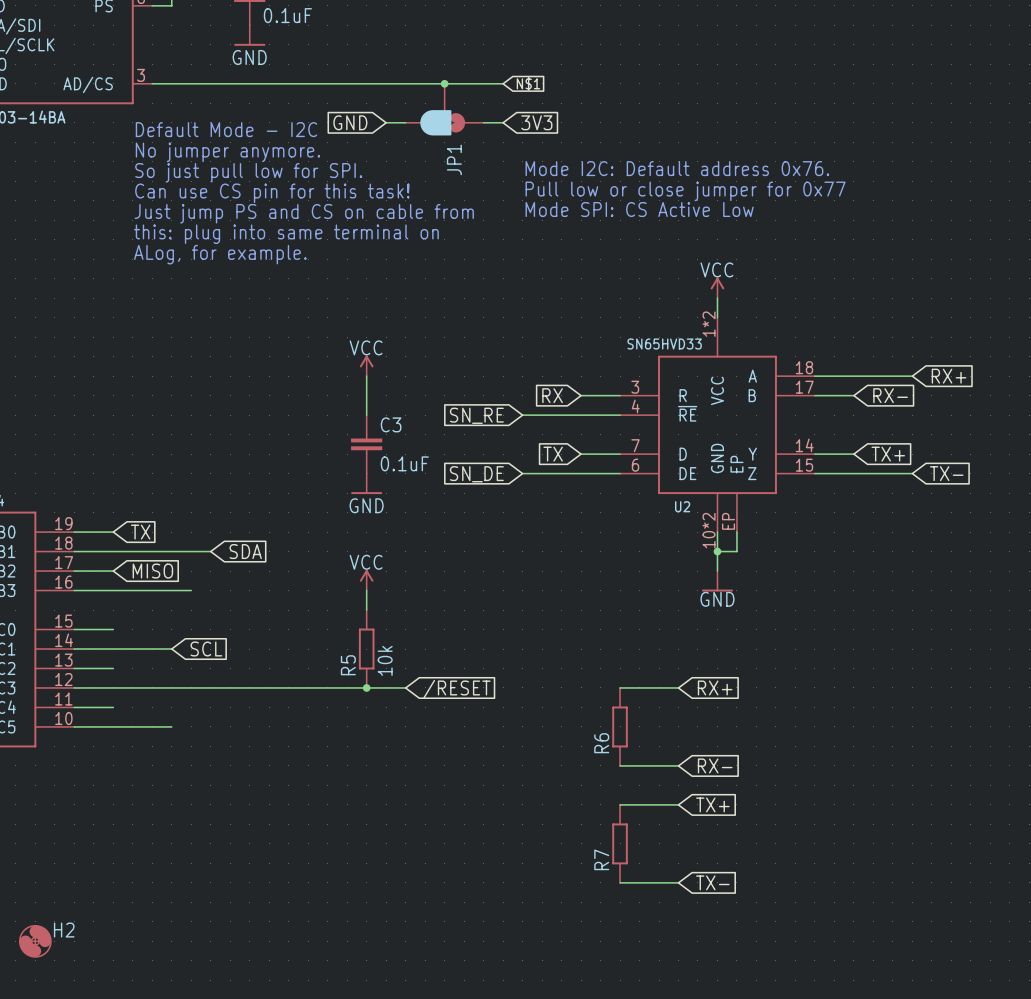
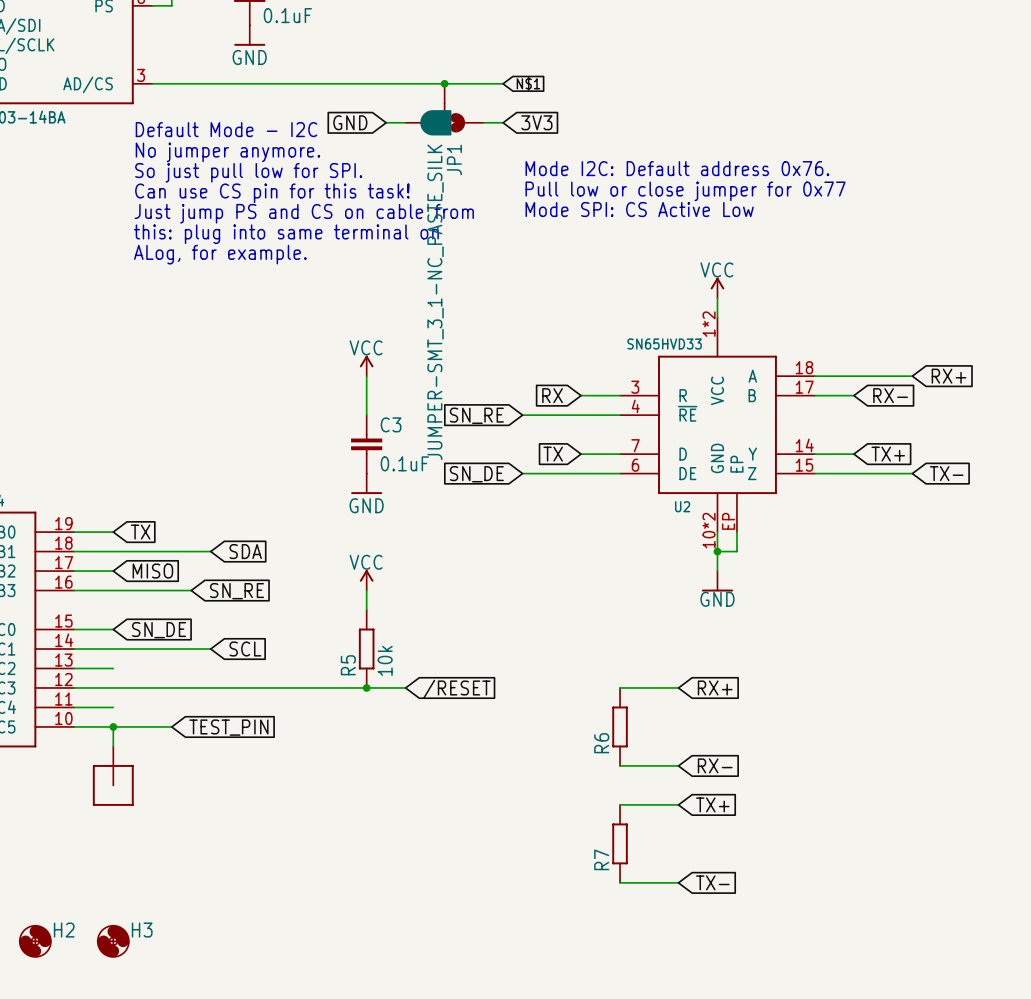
JP1 value: none -> JUMPER-SMT_3_1-NC_PASTE_SILK (435, 302)
global label: none -> SN_RE (237, 591)
global label: none -> SN_DE (159, 630)
wire: none -> (171, 649) (210, 649)
global label position: SCL (206, 649) -> SCL (245, 649)
wire: none -> (113, 726) (113, 746)
junction: none -> (113, 726)
global label: none -> TEST_PIN (228, 727)
part: none -> (113, 776)
H3: none -> (113, 941)

